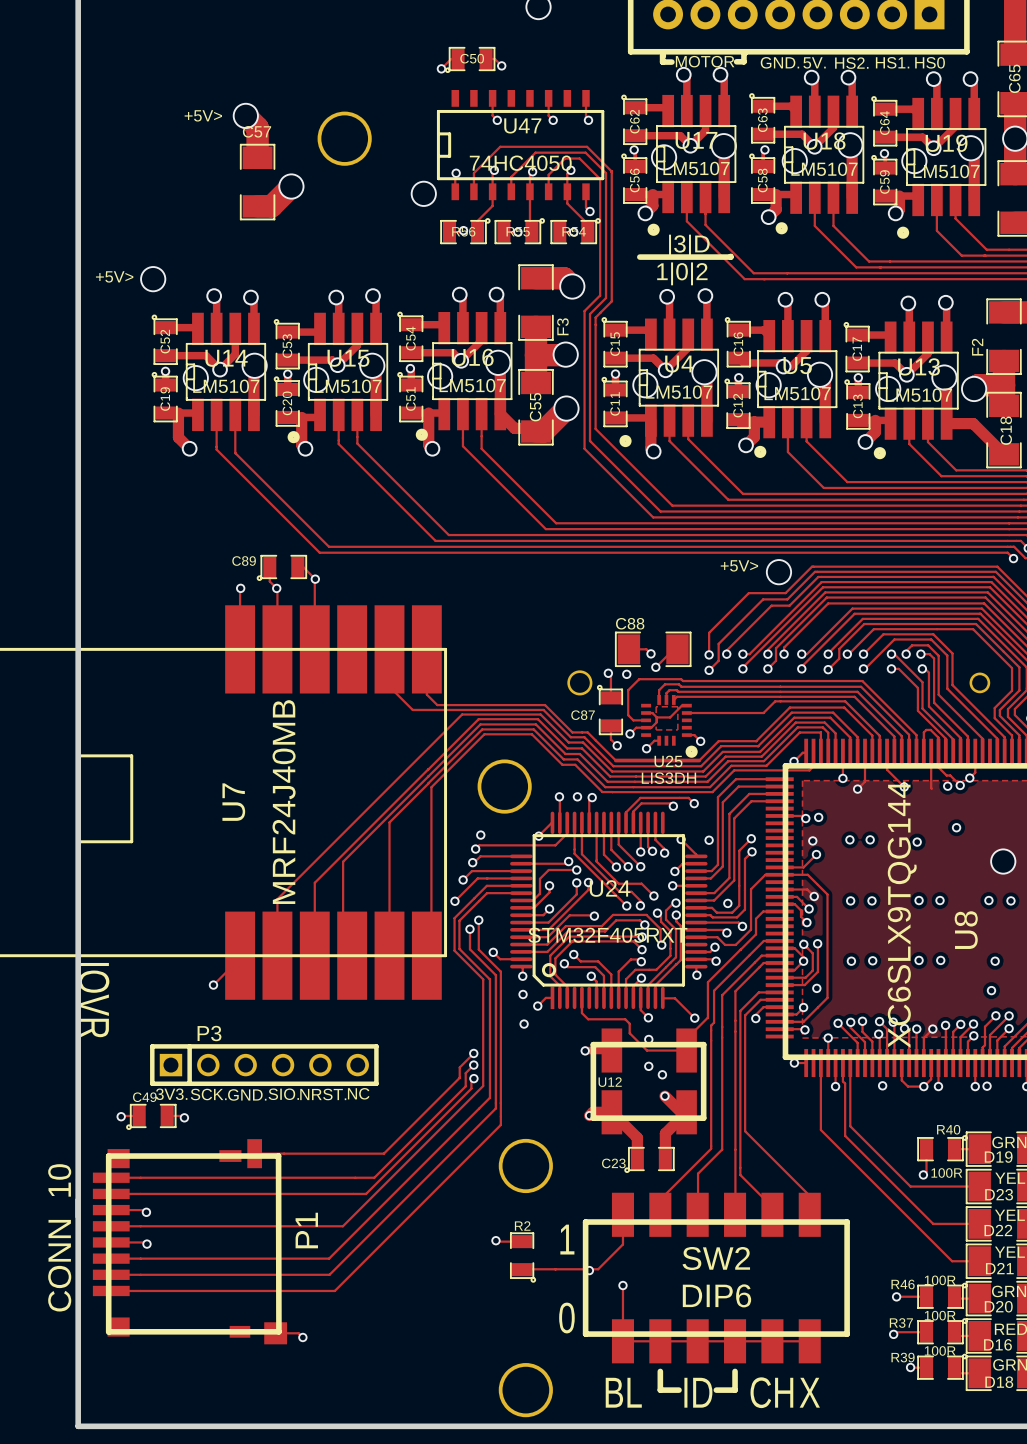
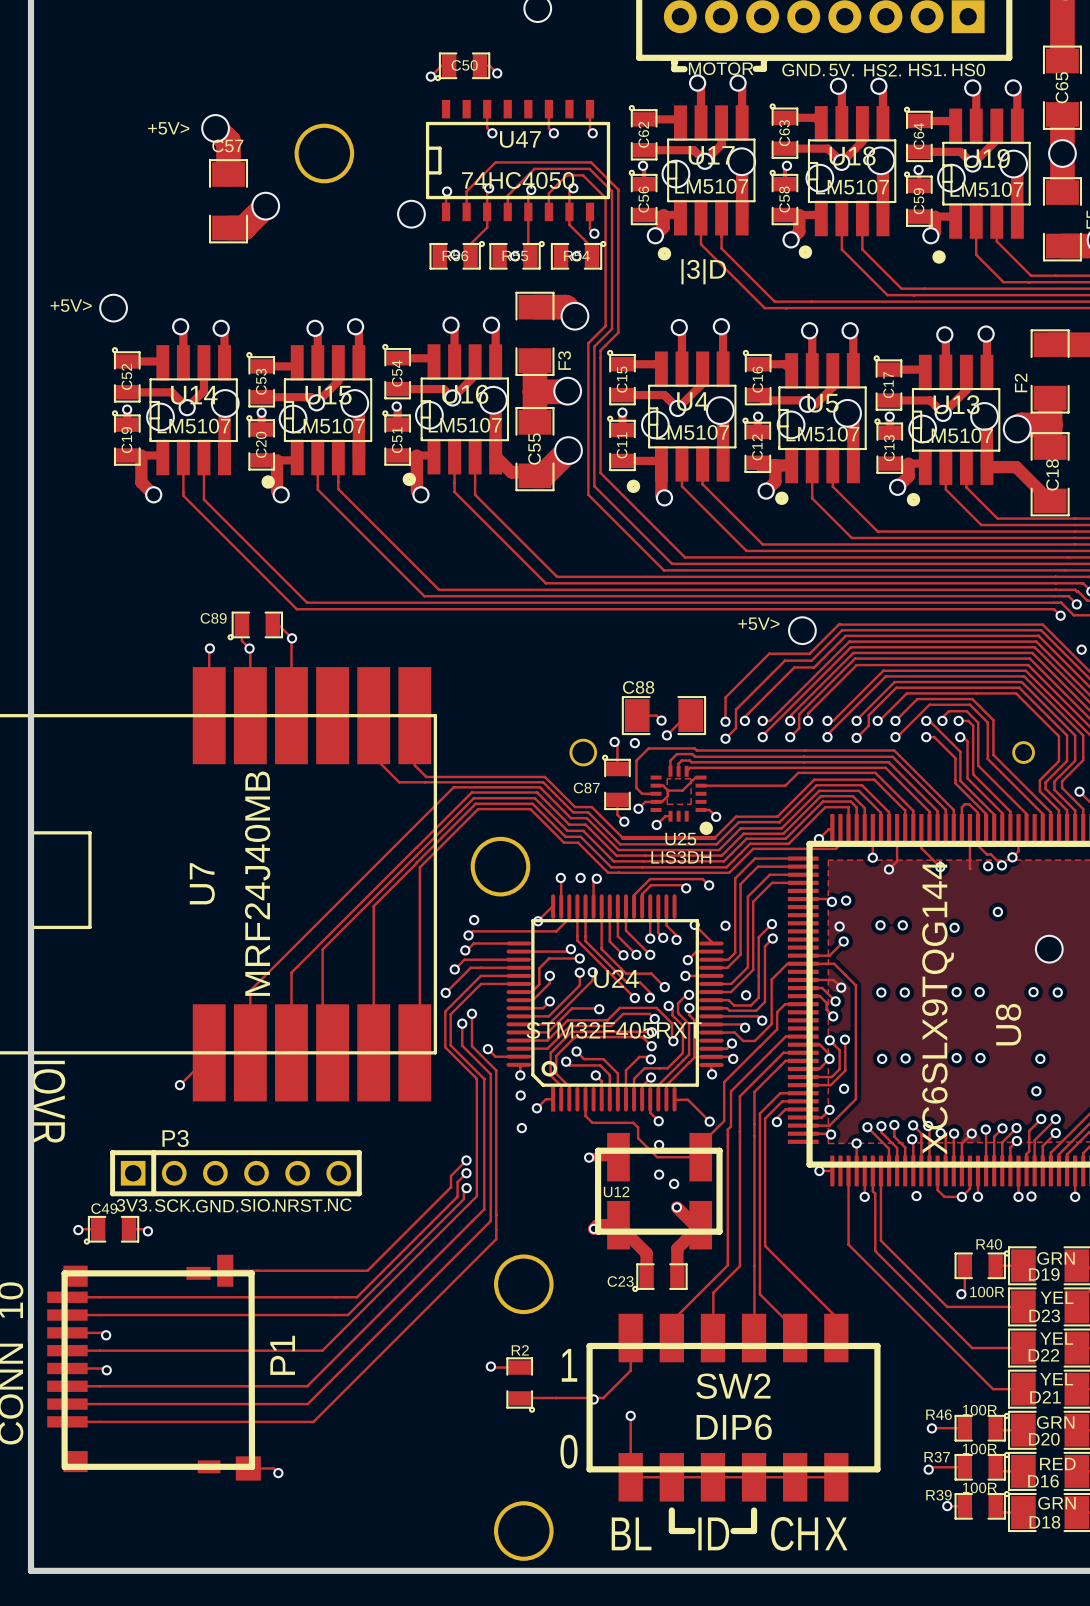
line: (730, 256) (639, 257) -> none
text: 1|0|2 (682, 273) -> none

